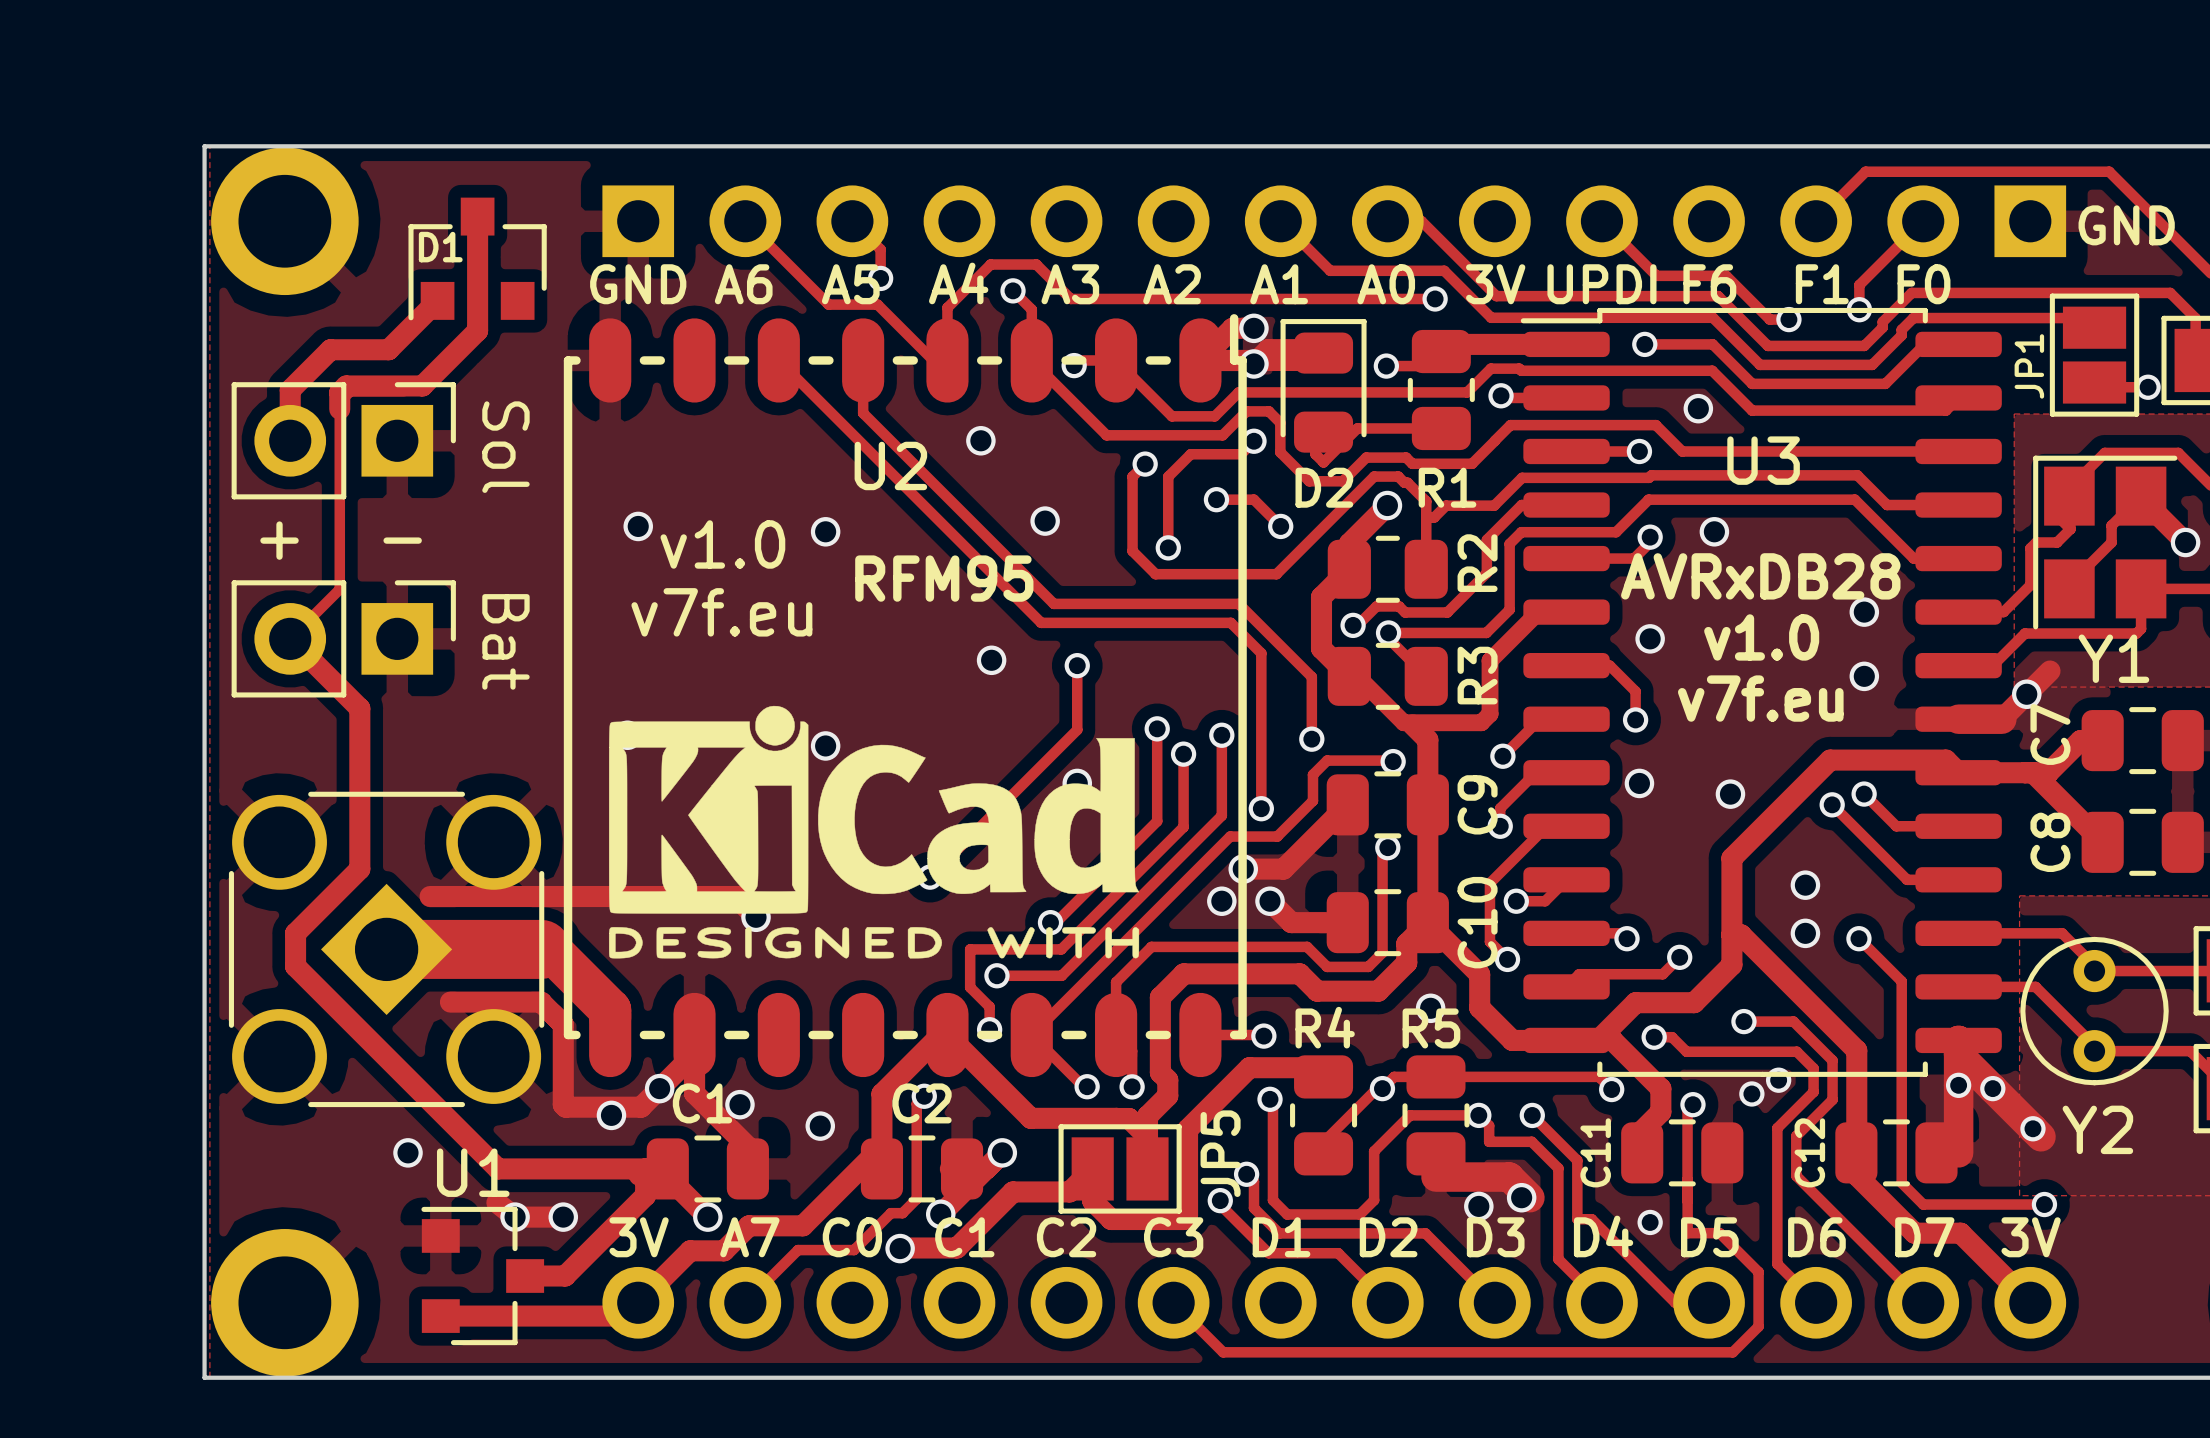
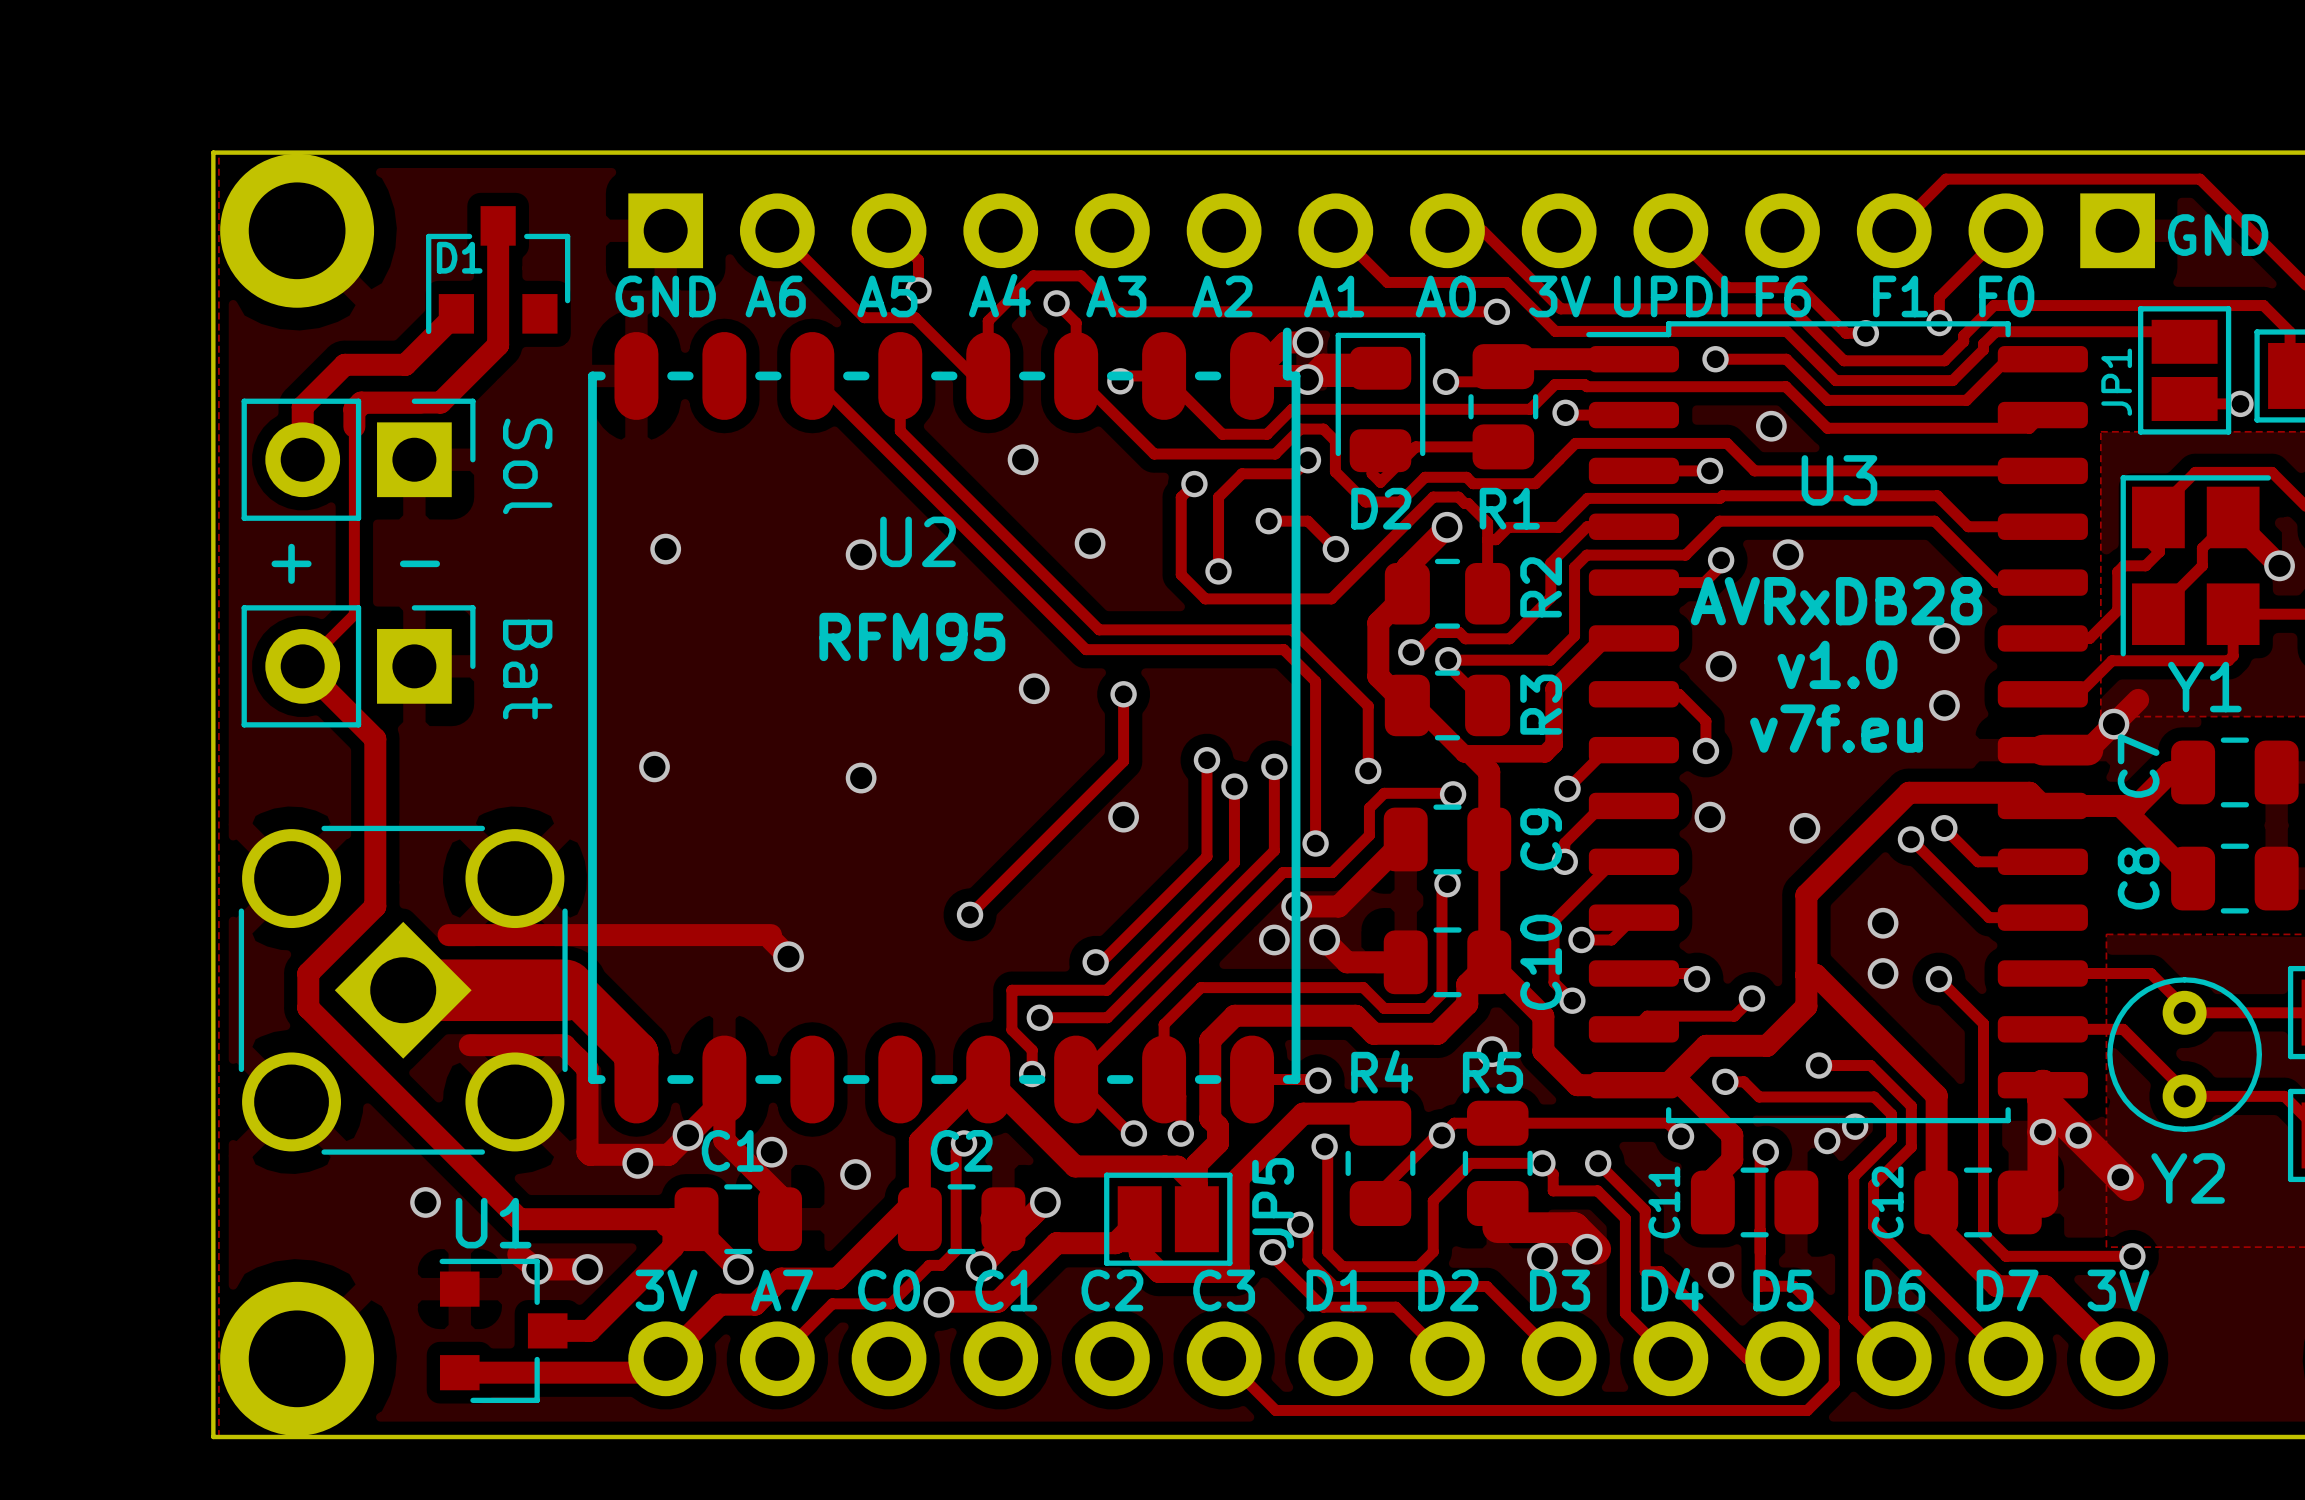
U2 name position: U2 (890, 465) -> U2 (918, 541)
text: v1.0 (722, 544) -> none
text position: RFM95 (944, 578) -> RFM95 (912, 636)
text: v7f.eu (721, 612) -> none
drawing: [608, 705, 1140, 959] -> none

